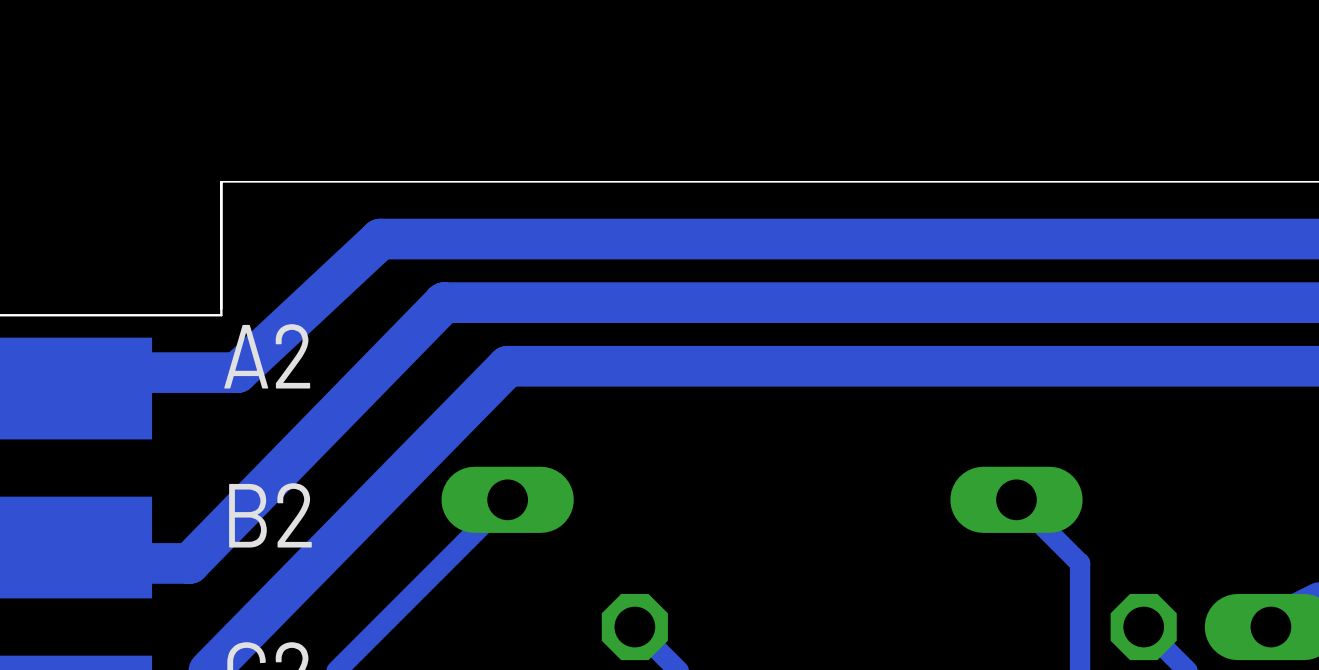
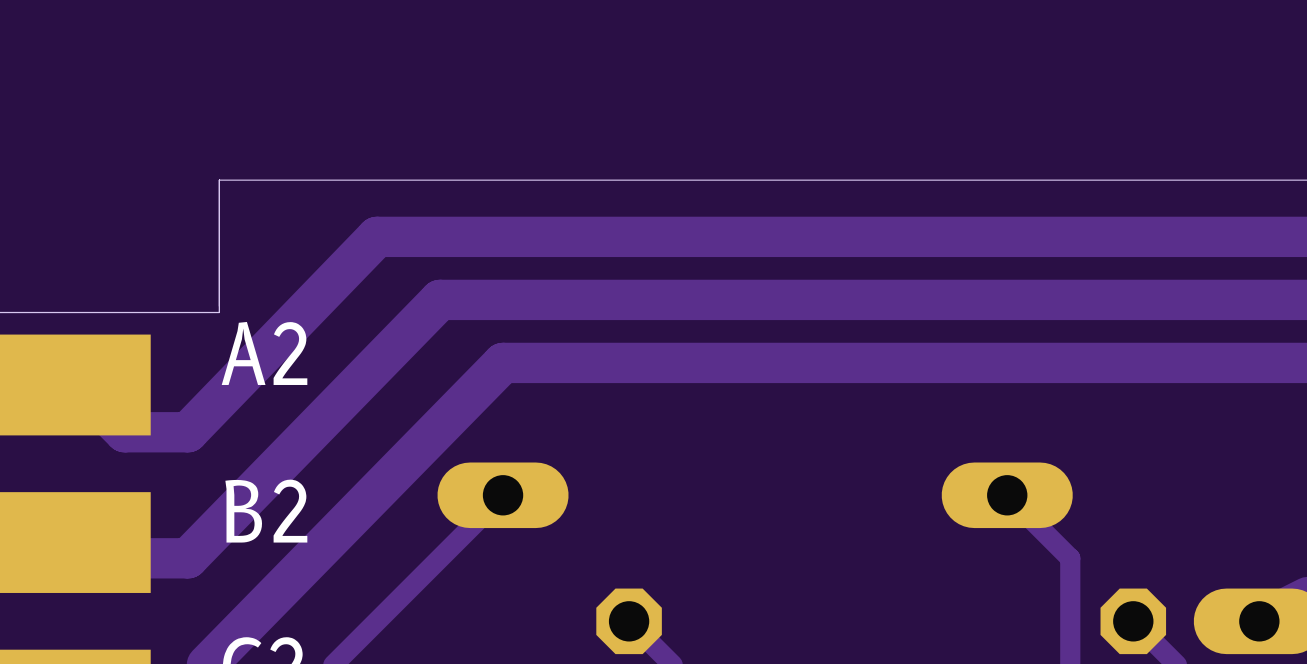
track: (380, 239) (237, 372) (126, 372) (81, 391) -> (376, 236) (187, 432) (124, 432) (80, 388)

